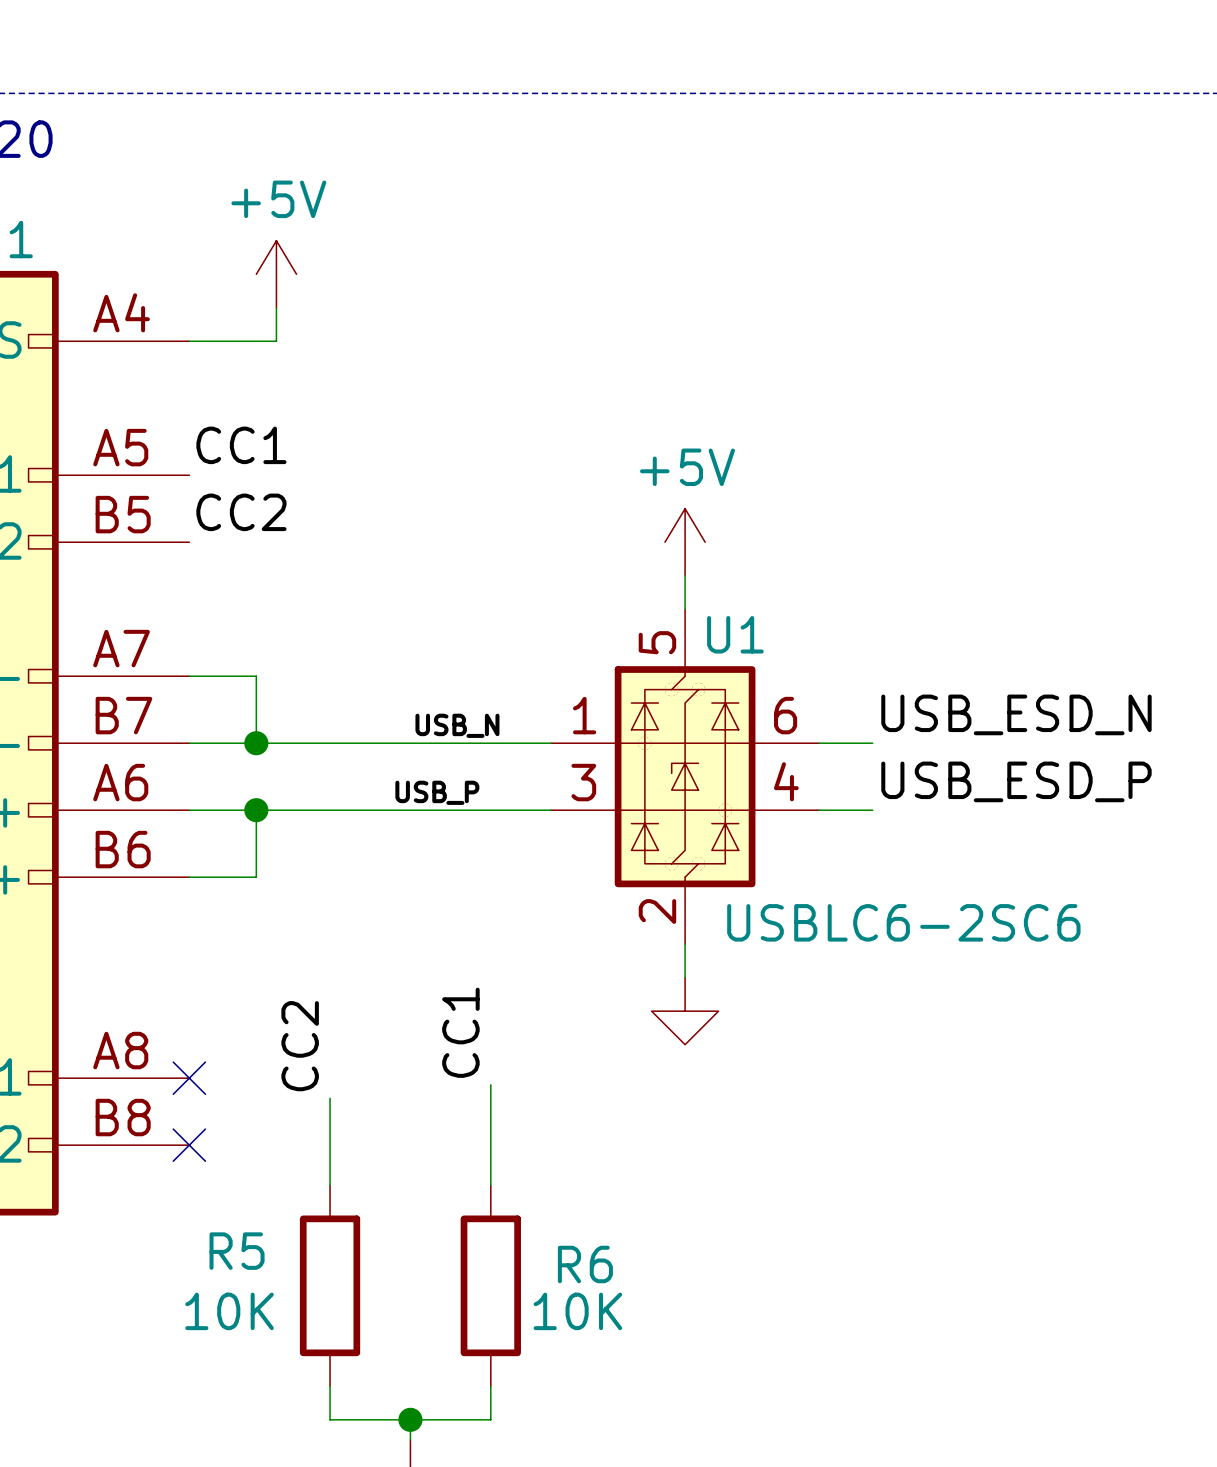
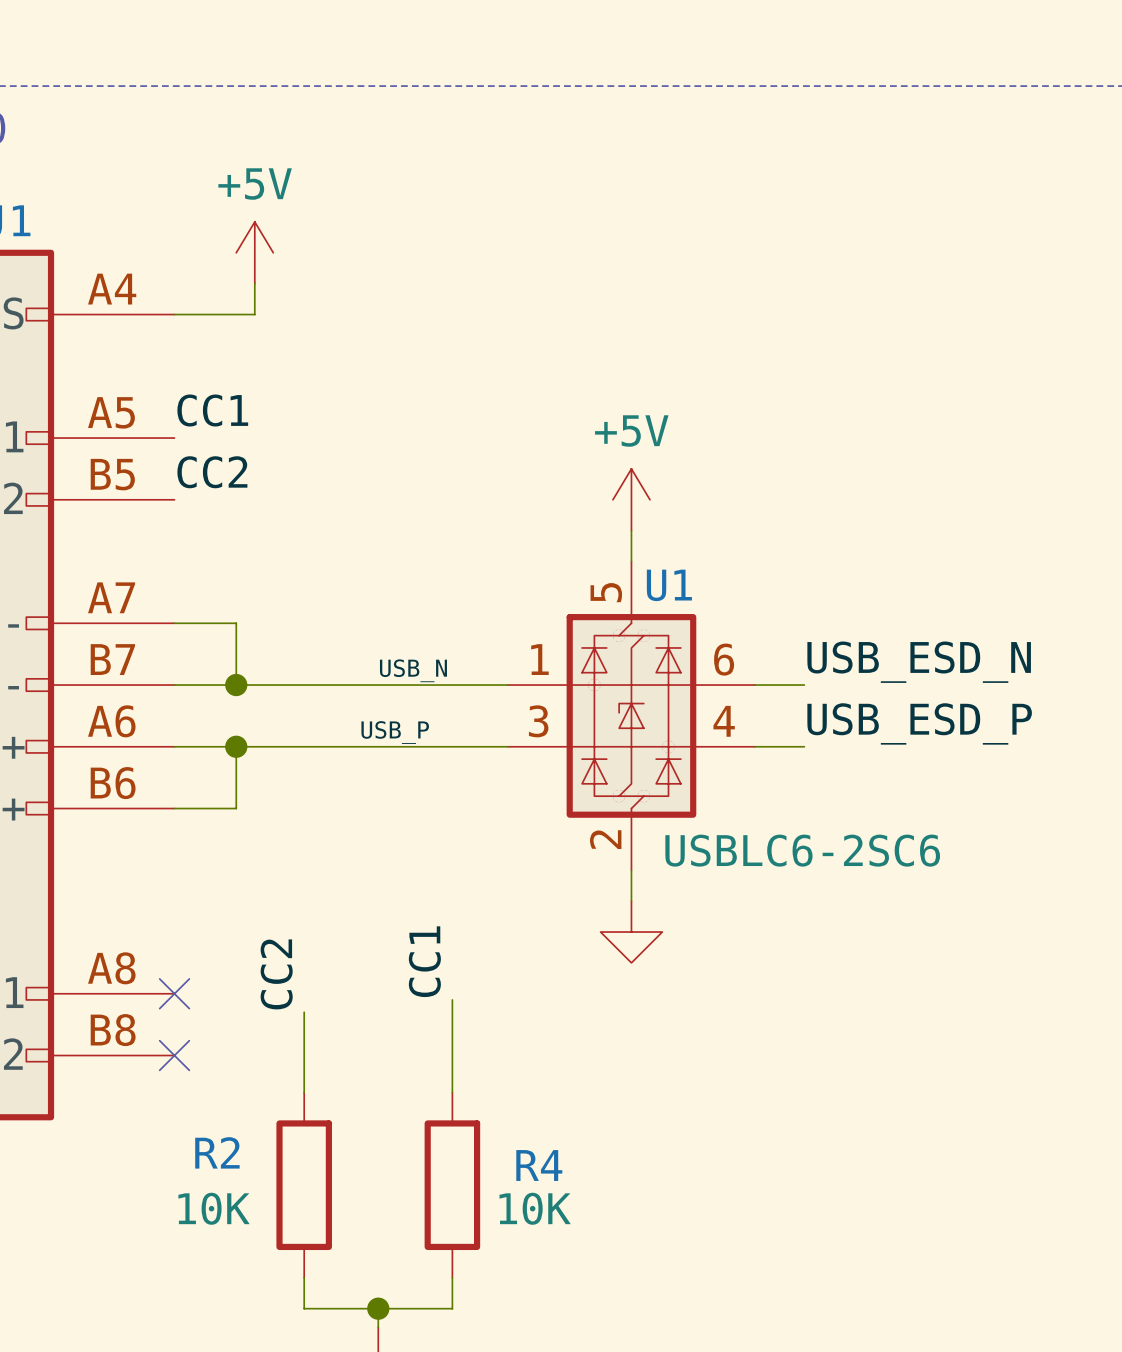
R5 name: R5 (237, 1251) -> R2 (217, 1152)
R6 name: R6 (585, 1264) -> R4 (539, 1165)

